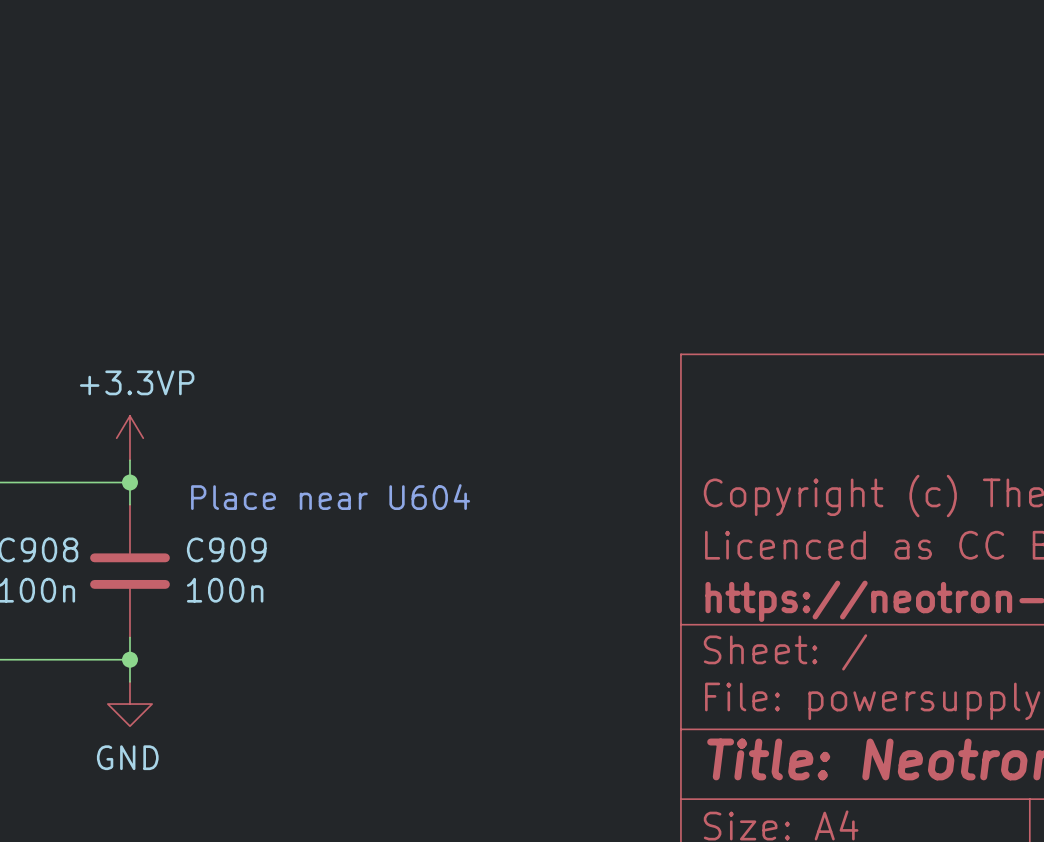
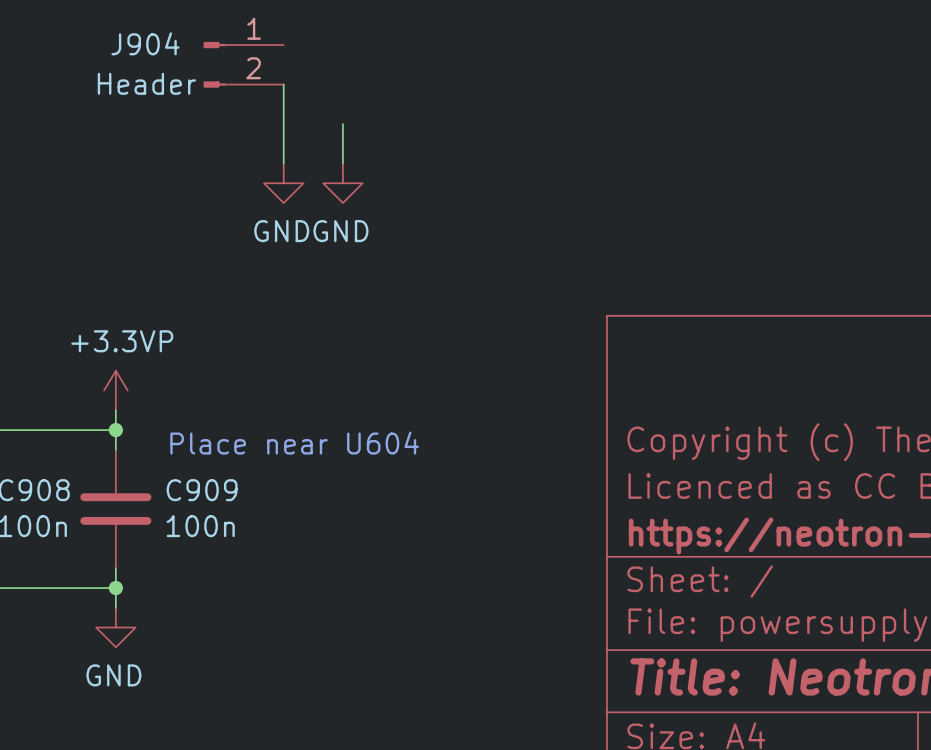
J904: none -> Header (243, 64)
wire: none -> (283, 84) (283, 163)
wire: none -> (342, 124) (342, 163)
power symbol: none -> GND (283, 183)
power symbol: none -> GND (342, 183)

